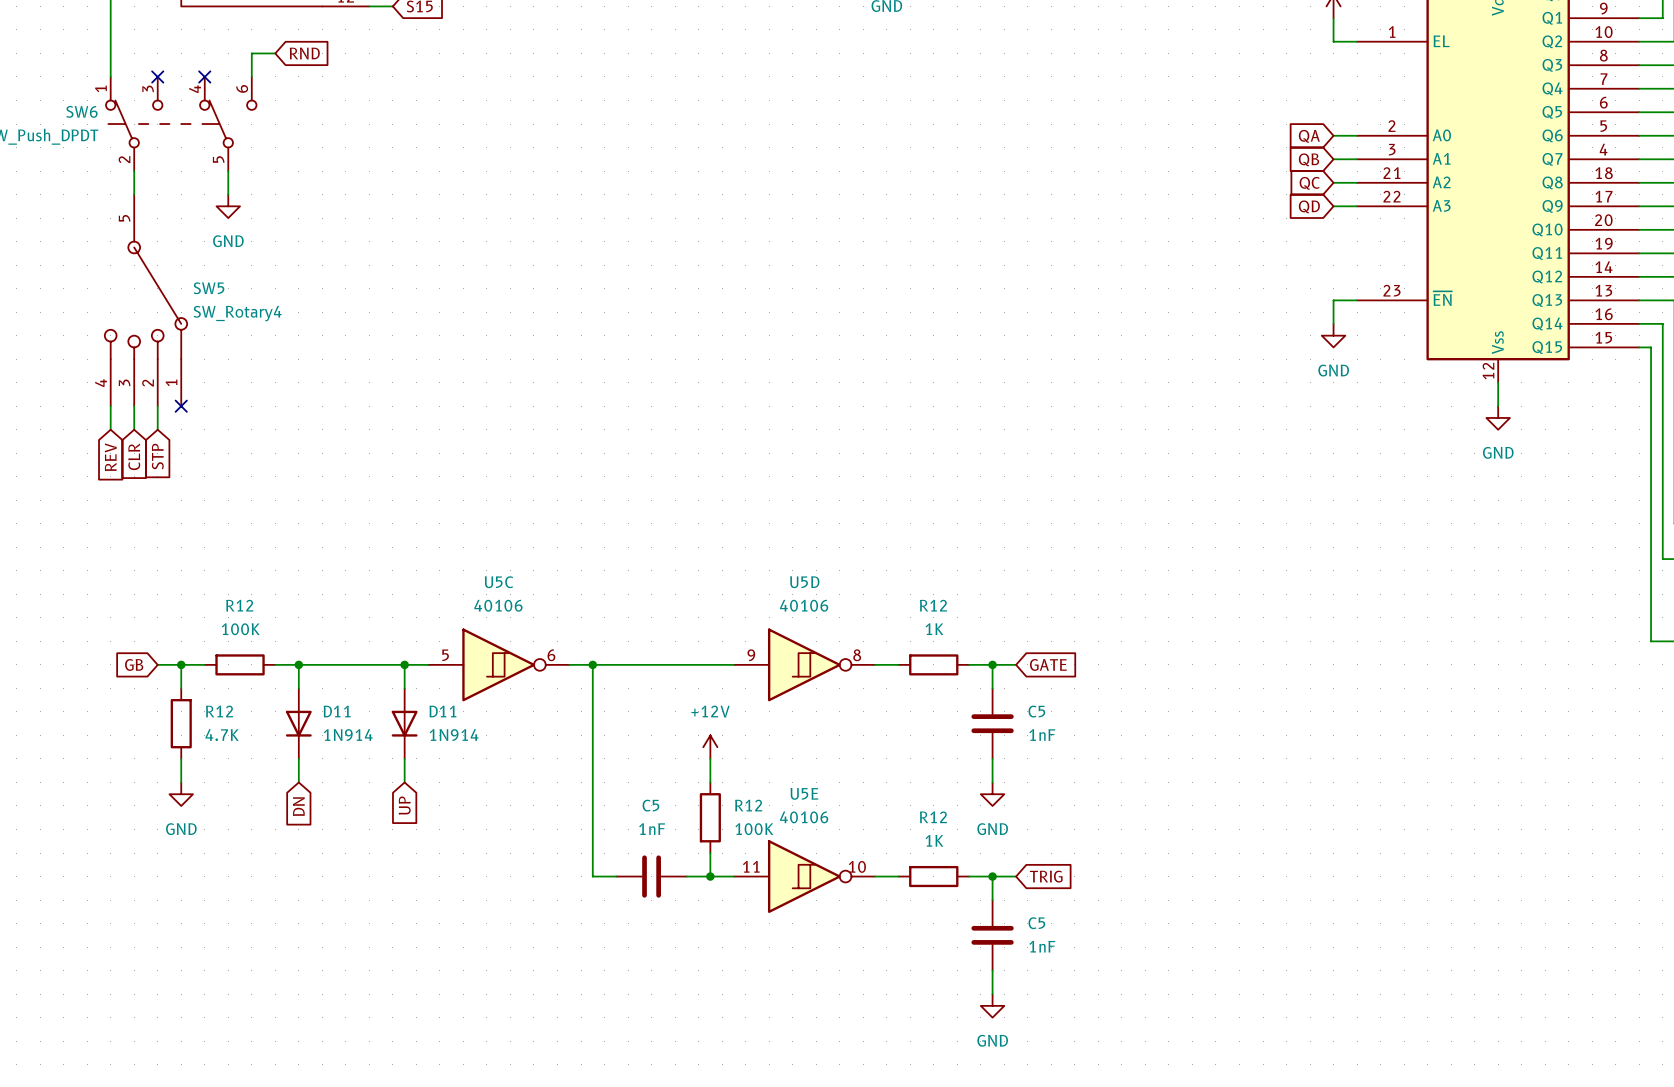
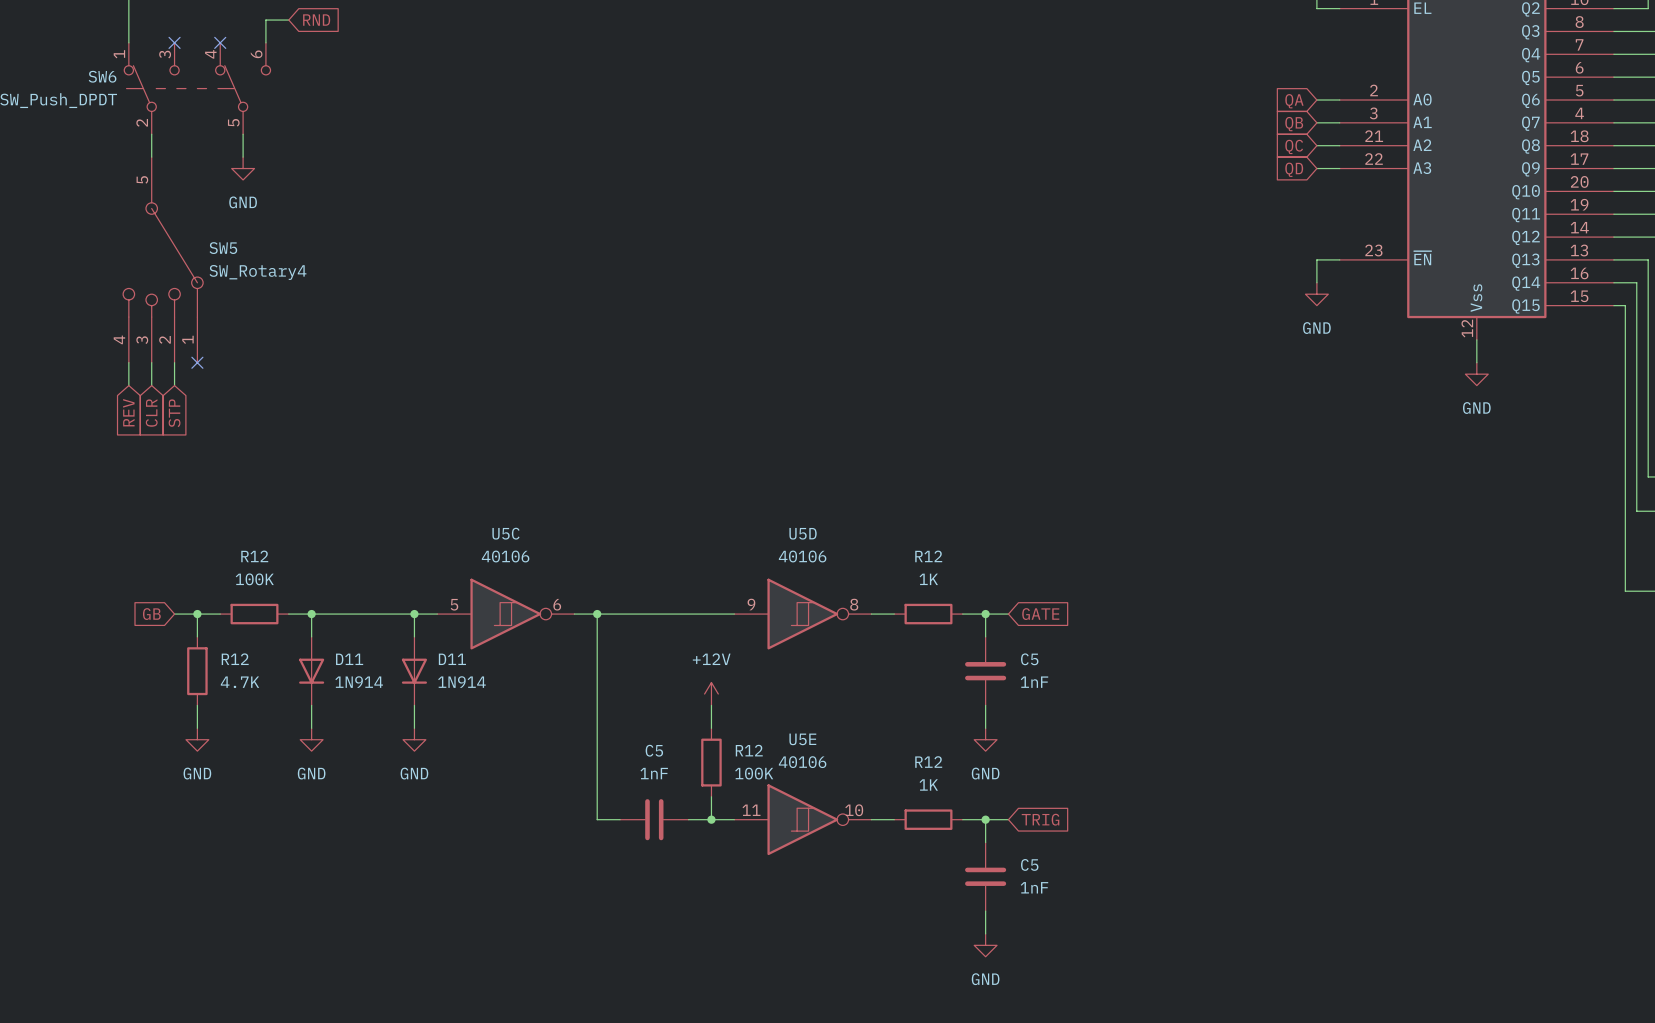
power symbol: none -> GND (311, 739)
power symbol: none -> GND (414, 739)
global label: UP (404, 805) -> none
global label: DN (298, 806) -> none

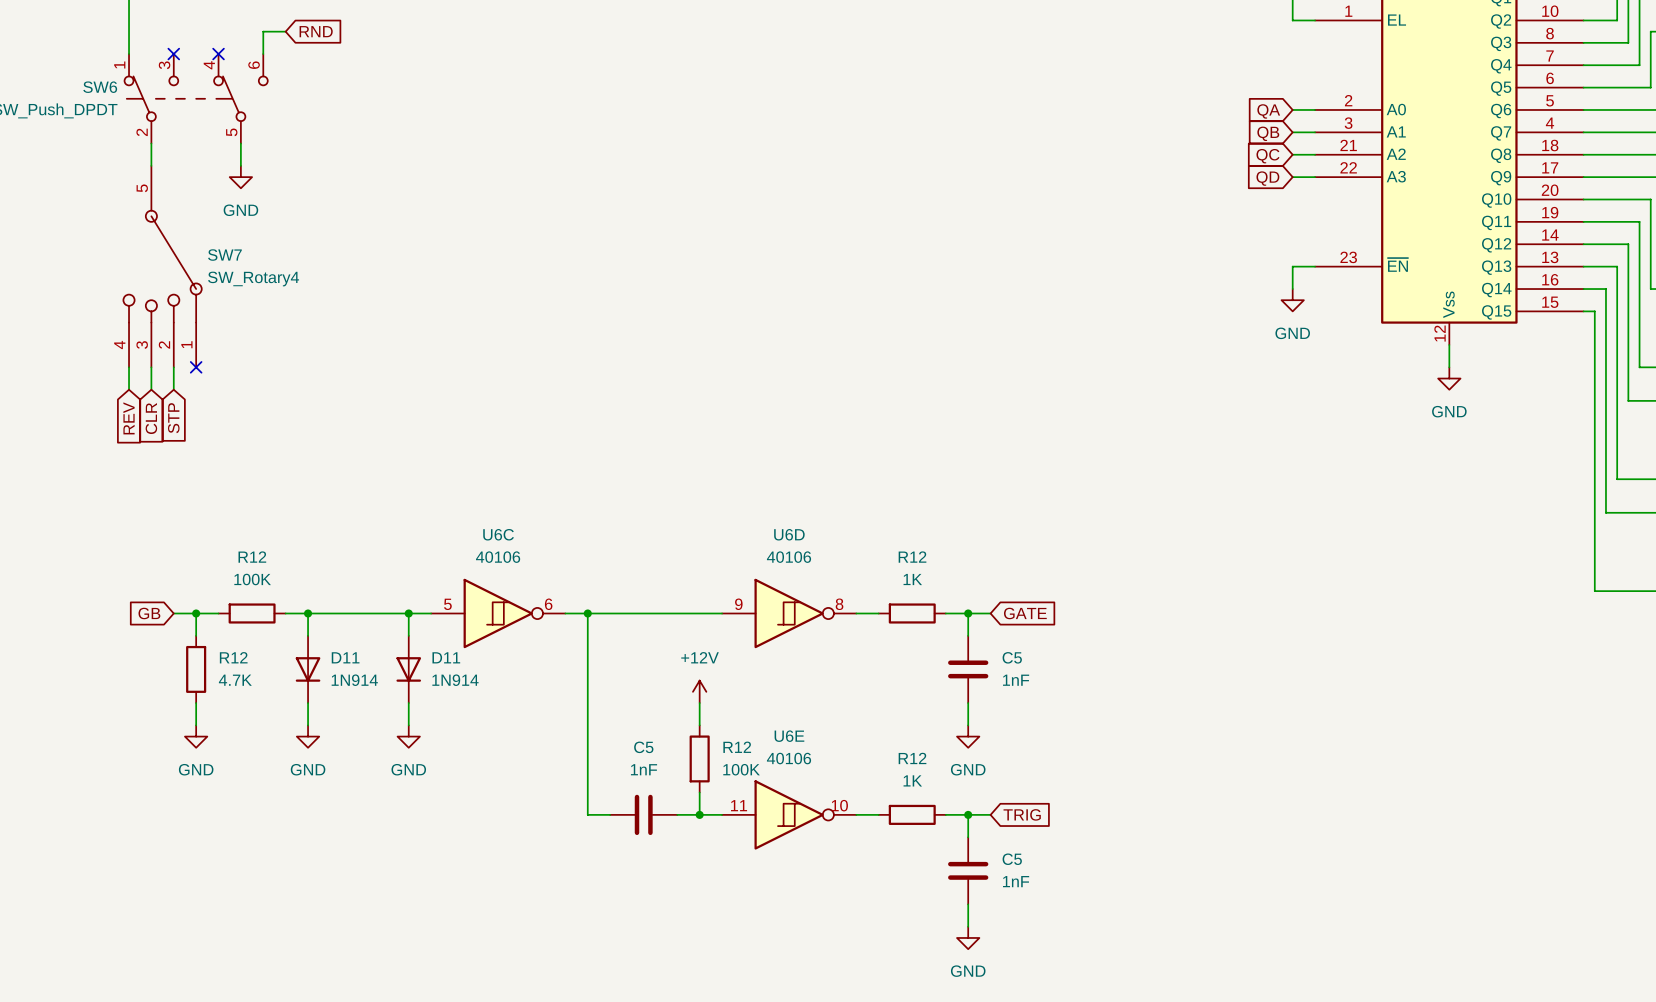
SW5 name: SW5 (223, 248) -> SW7 (224, 255)
U5C name: U5C (505, 533) -> U6C (498, 534)
U5D name: U5D (803, 533) -> U6D (789, 534)
U5E name: U5E (802, 739) -> U6E (789, 736)

